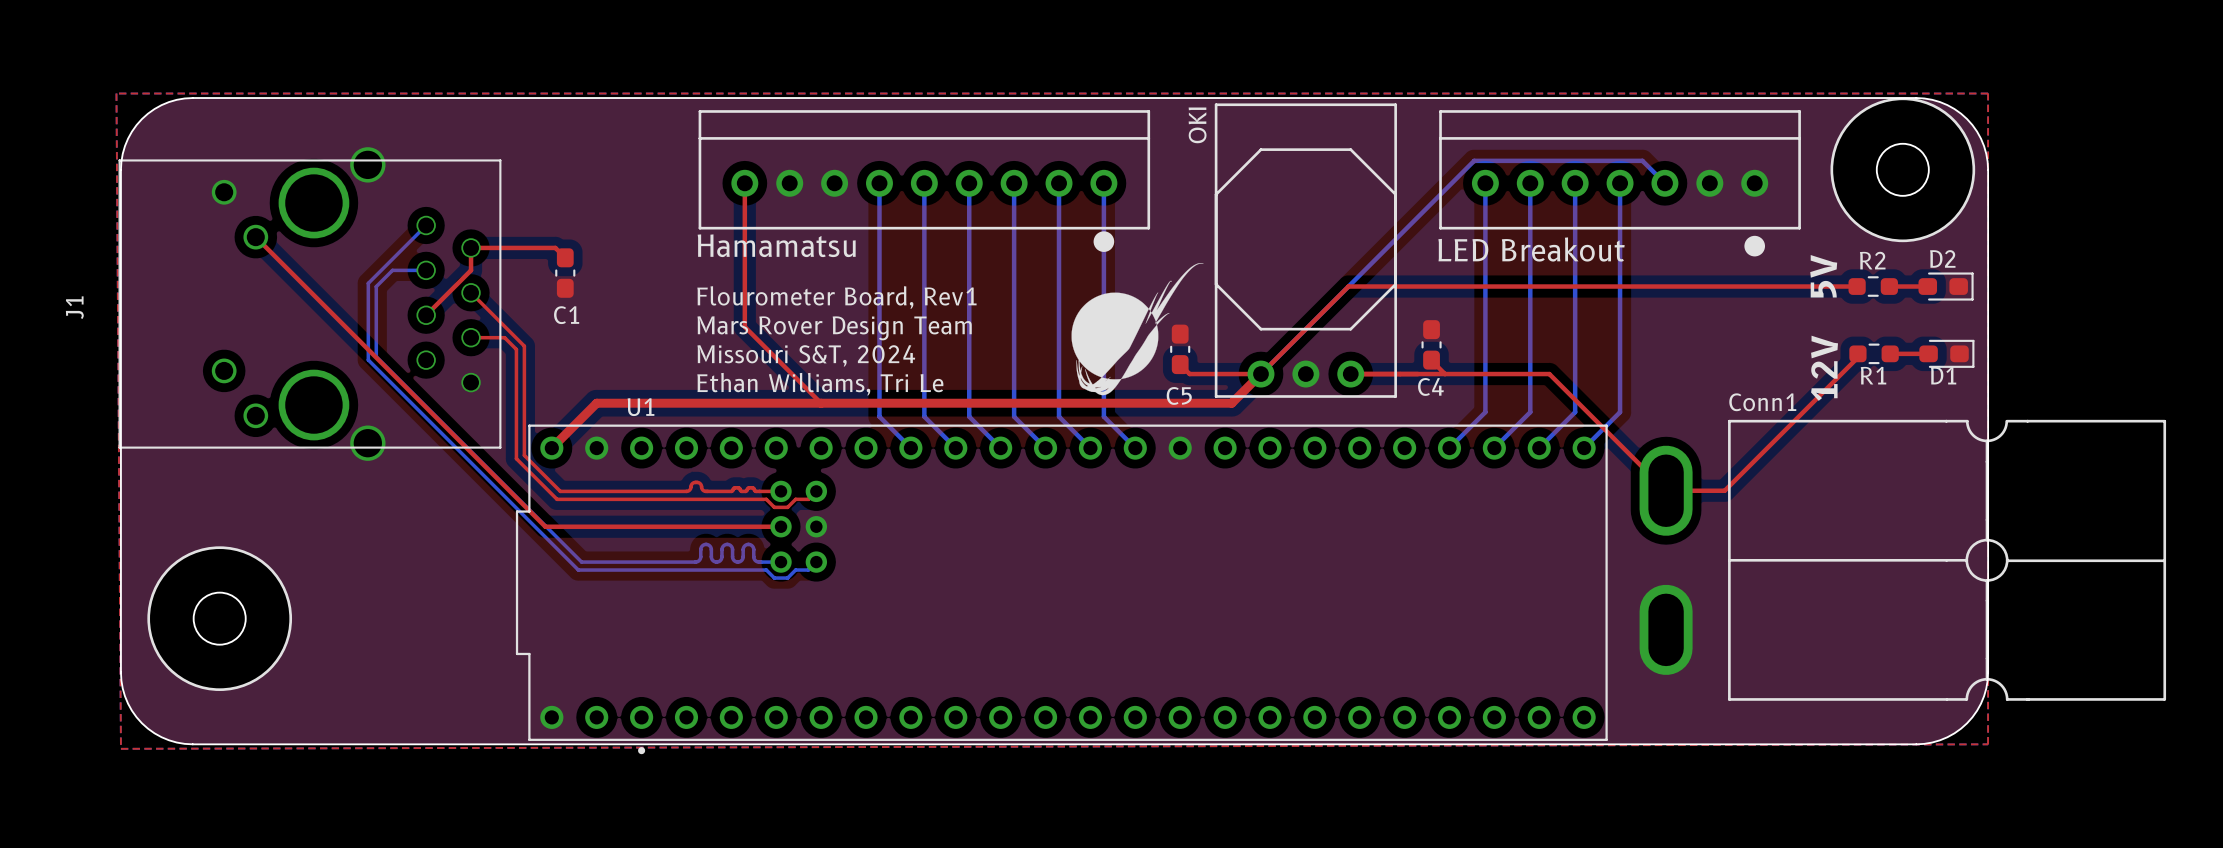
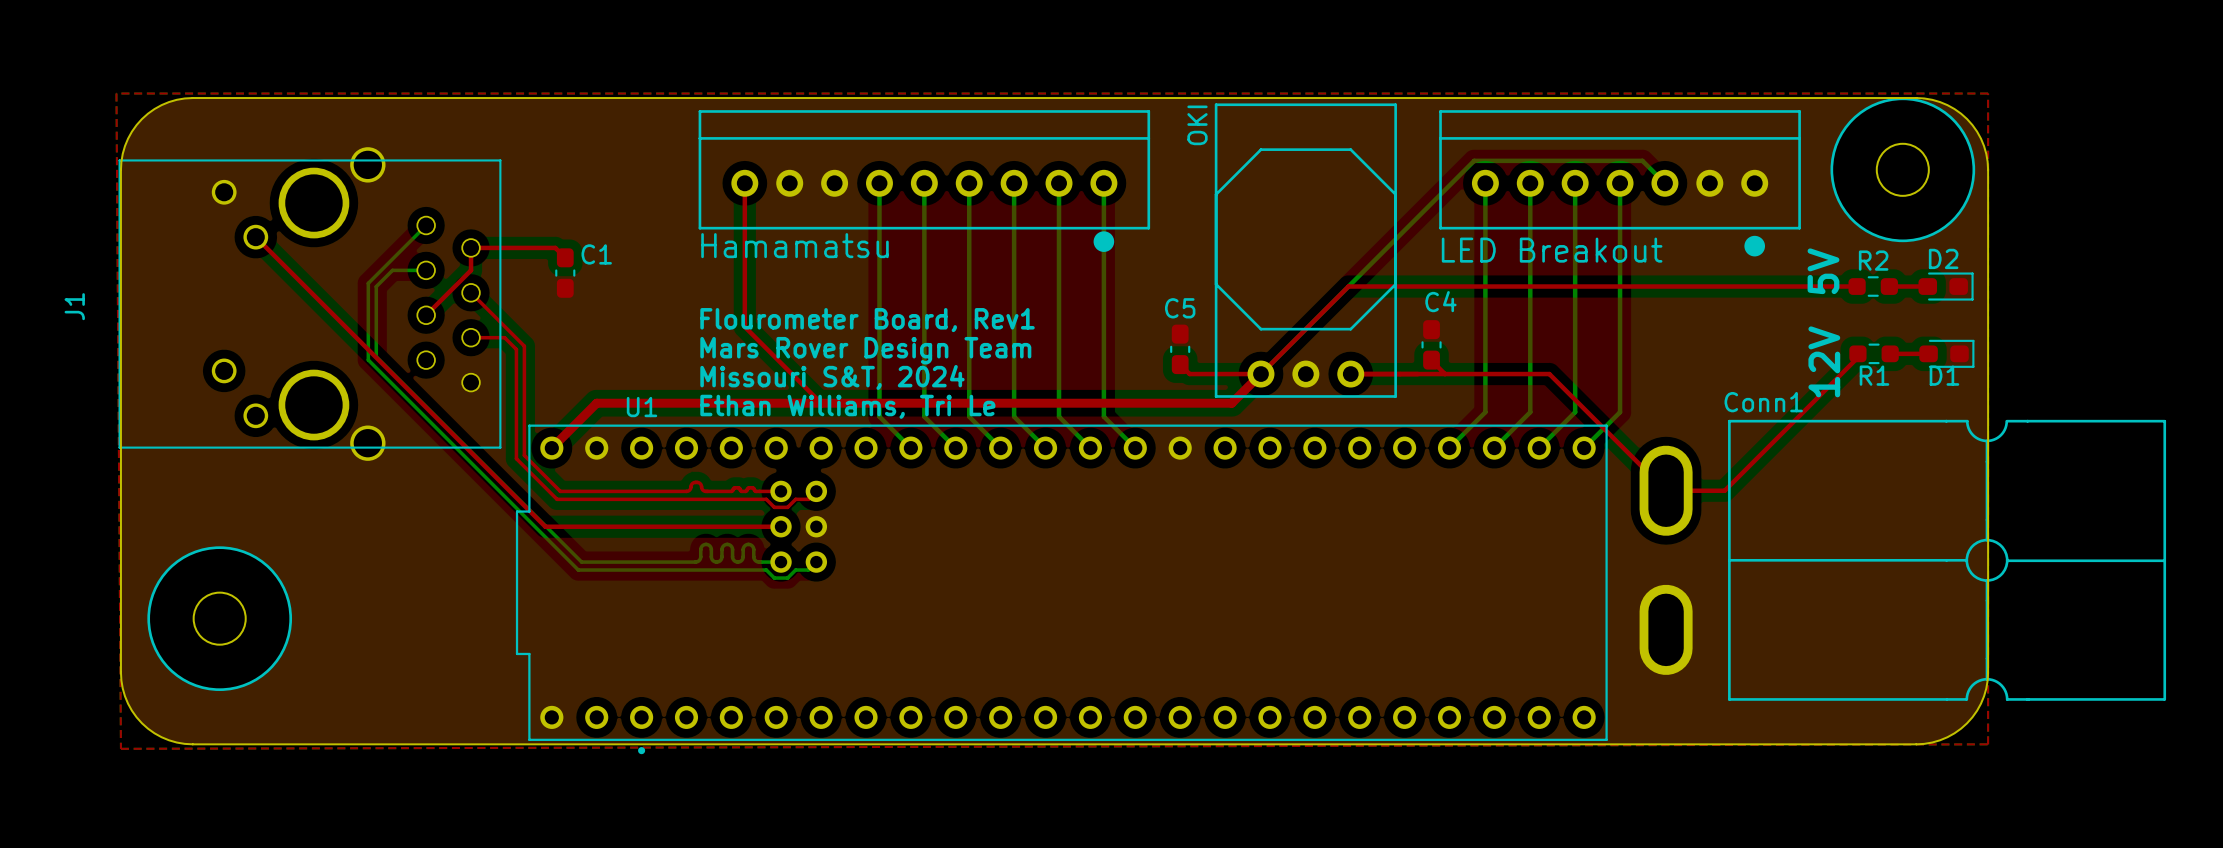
drawing: [1071, 263, 1204, 396] -> none
text: Flourometer Board, Rev1 (836, 297) -> none
C1 name position: C1 (566, 315) -> C1 (596, 254)
text: Mars Rover Design Team (834, 328) -> Flourometer Board, Rev1 (867, 320)
text: Missouri S&T, 2024 (806, 355) -> Mars Rover Design Team (865, 350)
text: Ethan Williams, Tri Le (820, 384) -> Missouri S&T, 2024 (832, 377)
C4 name position: C4 (1430, 386) -> C4 (1440, 301)
C5 name position: C5 (1179, 395) -> C5 (1180, 308)
text: none -> Ethan Williams, Tri Le (847, 406)

